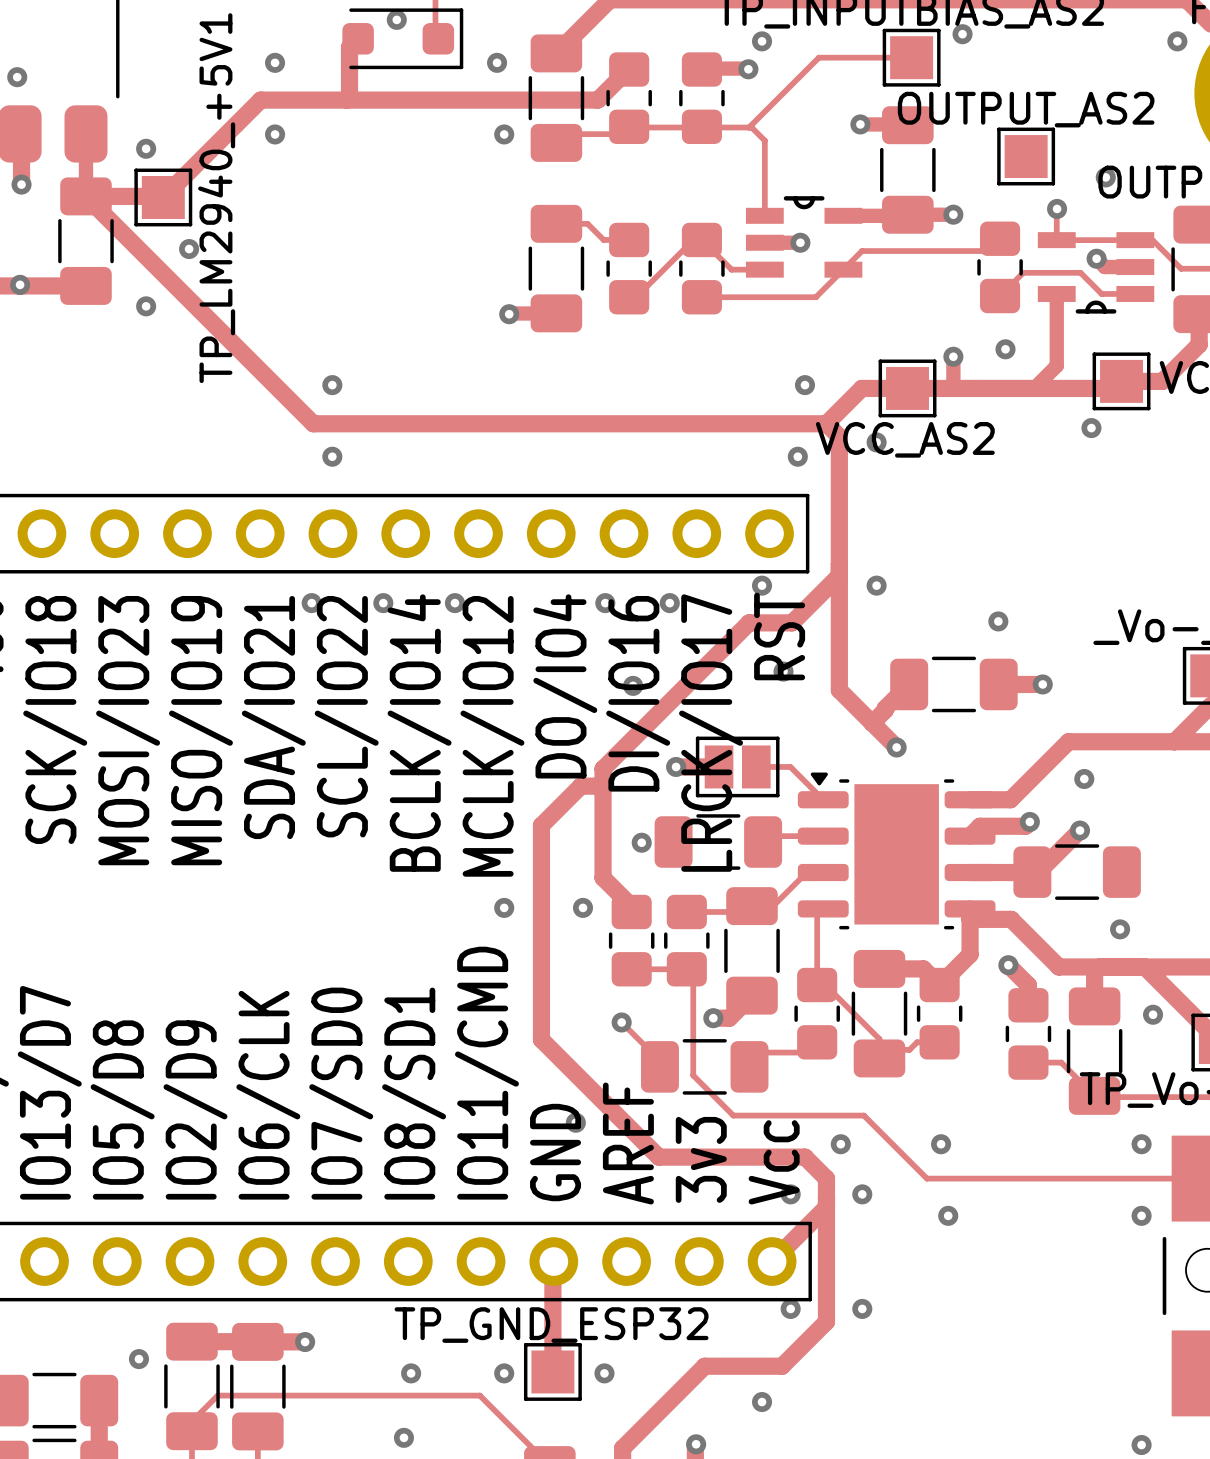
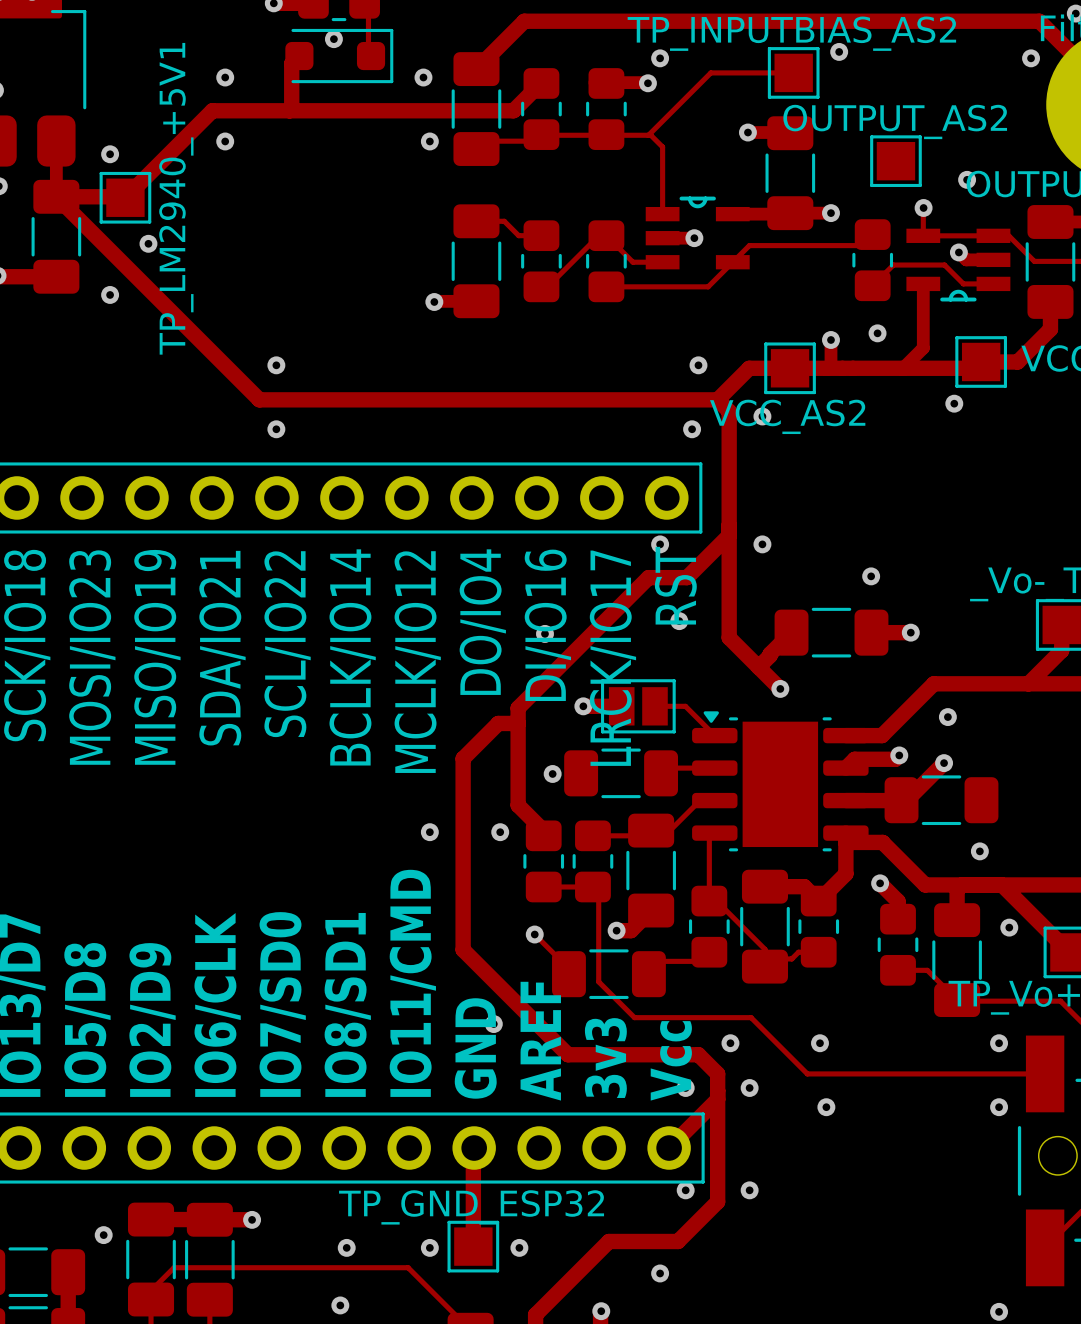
via: (311, 603) -> none
via: (383, 603) -> none
via: (454, 603) -> none
via: (605, 603) -> none
via: (669, 603) -> none

